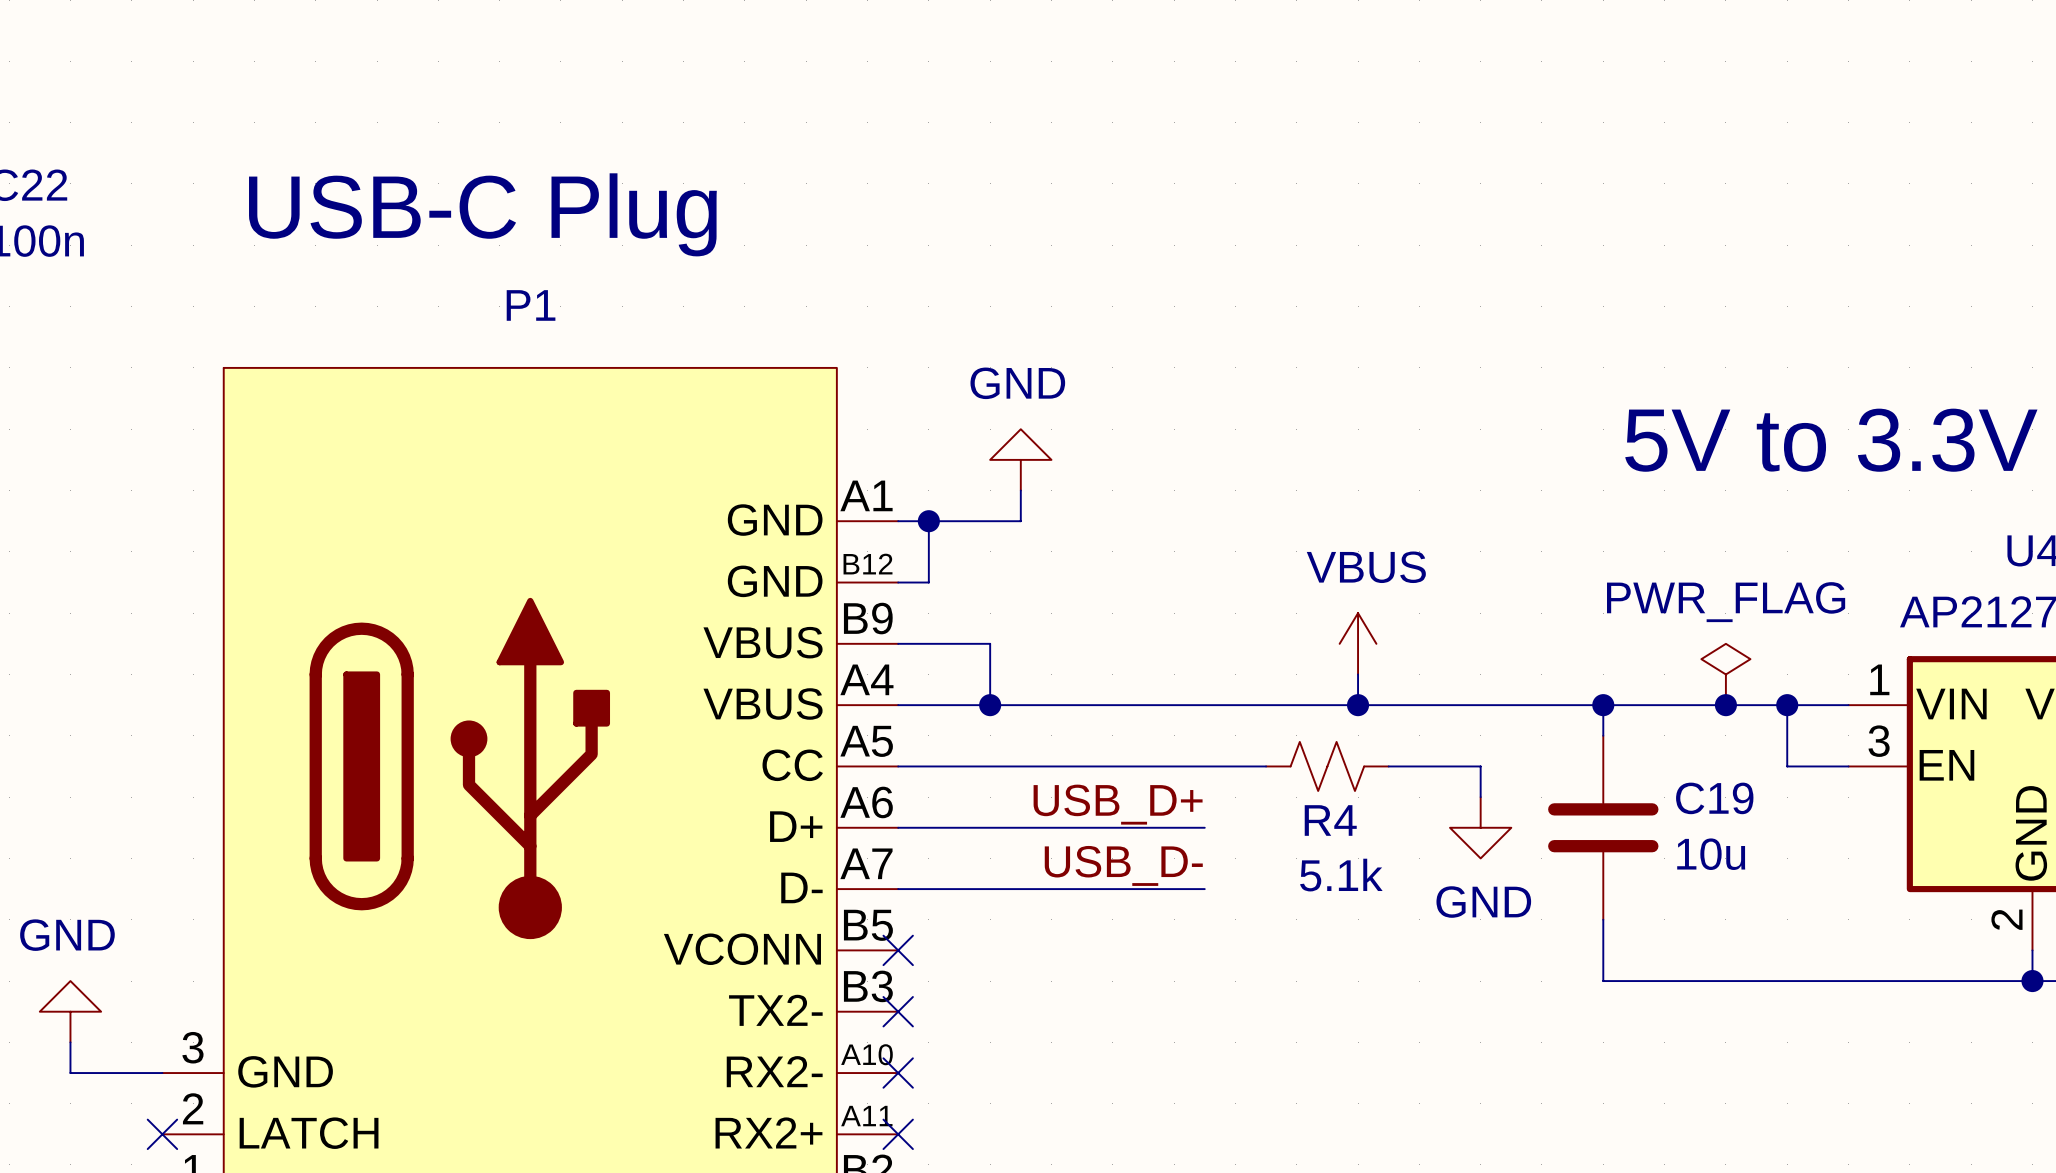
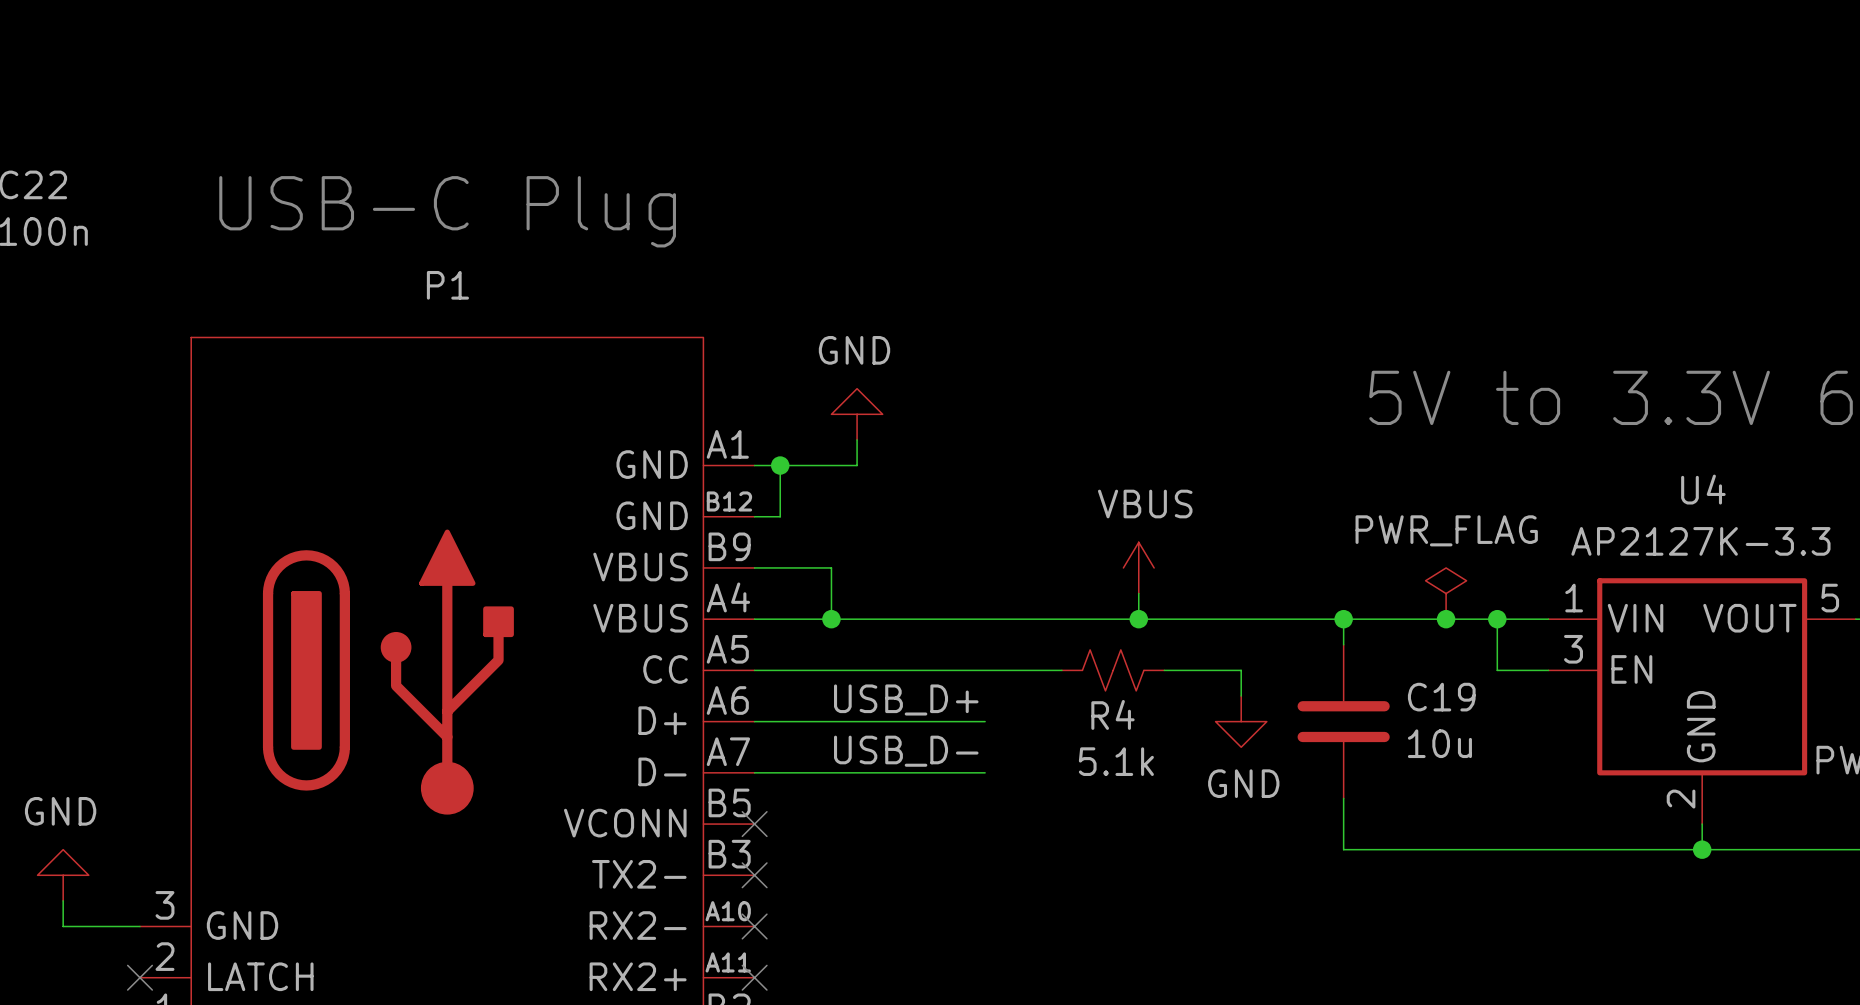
label position: USB_D+ (1118, 804) -> USB_D+ (906, 699)
wire: (1174, 827) (1204, 827) -> none
label position: USB_D- (1123, 865) -> USB_D- (906, 751)
wire: (1174, 889) (1204, 889) -> none

